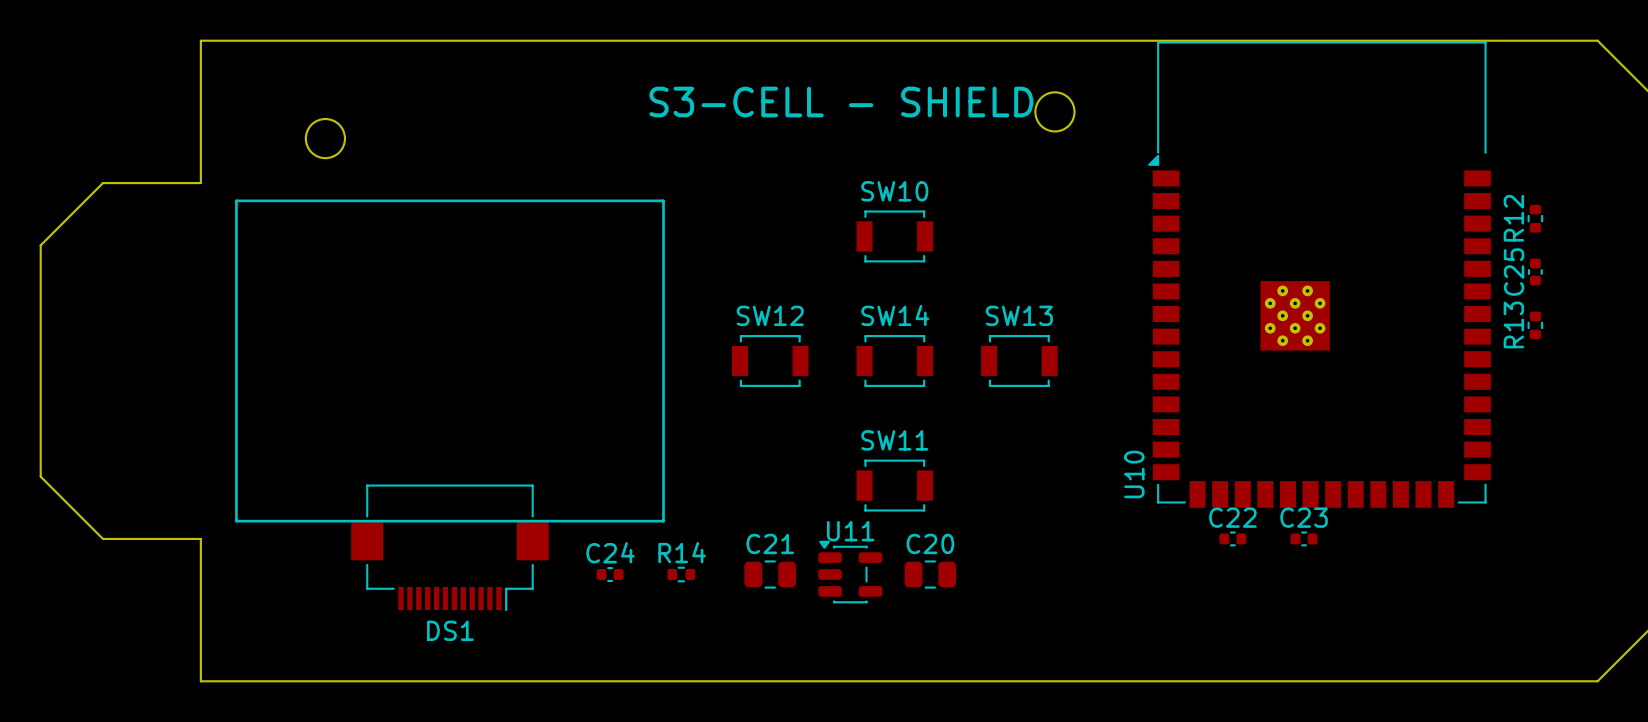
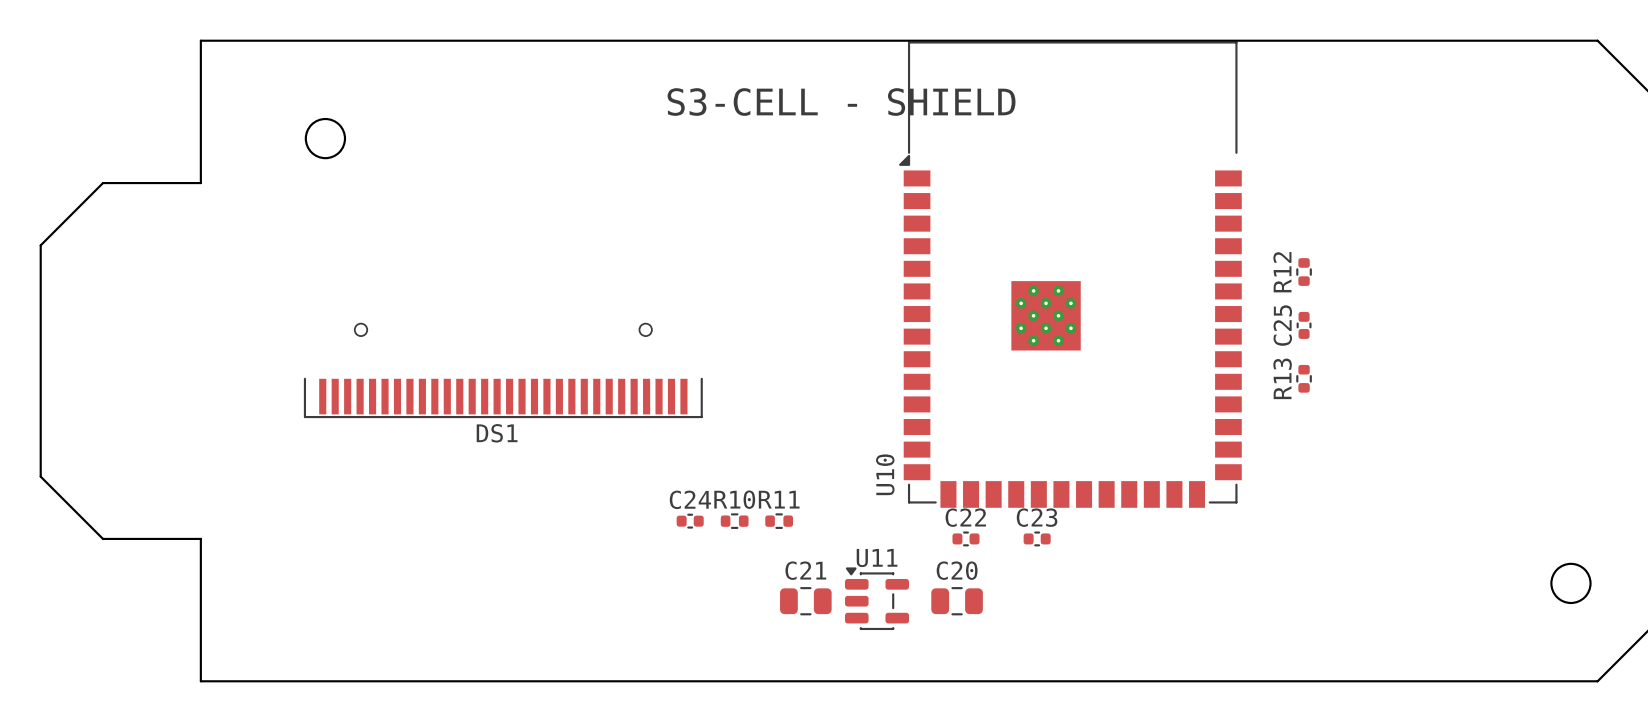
round board edge: [1034, 91, 1076, 133] -> none
line: (236, 200) (663, 200) (663, 521) (236, 521) (236, 200) -> none
R12 position: (1535, 218) -> (1304, 272)
SW10: (894, 236) -> none
C25 position: (1535, 272) -> (1304, 325)
U10 position: (1319, 274) -> (1070, 274)
R13 position: (1535, 325) -> (1304, 378)
SW12: (770, 361) -> none
SW14: (894, 361) -> none
SW13: (1019, 361) -> none
DS1 footprint: [351, 484, 549, 612] -> [303, 322, 703, 419]
SW11: (894, 485) -> none
R10: none -> (734, 521)
R11: none -> (779, 521)
C22 position: (1232, 538) -> (965, 538)
C23 position: (1304, 538) -> (1037, 538)
round board edge: none -> [1550, 562, 1592, 605]
U11 position: (850, 572) -> (877, 598)
C24 position: (610, 574) -> (690, 521)
R14: (681, 574) -> none
C21 position: (770, 574) -> (805, 601)
C20 position: (930, 574) -> (957, 601)

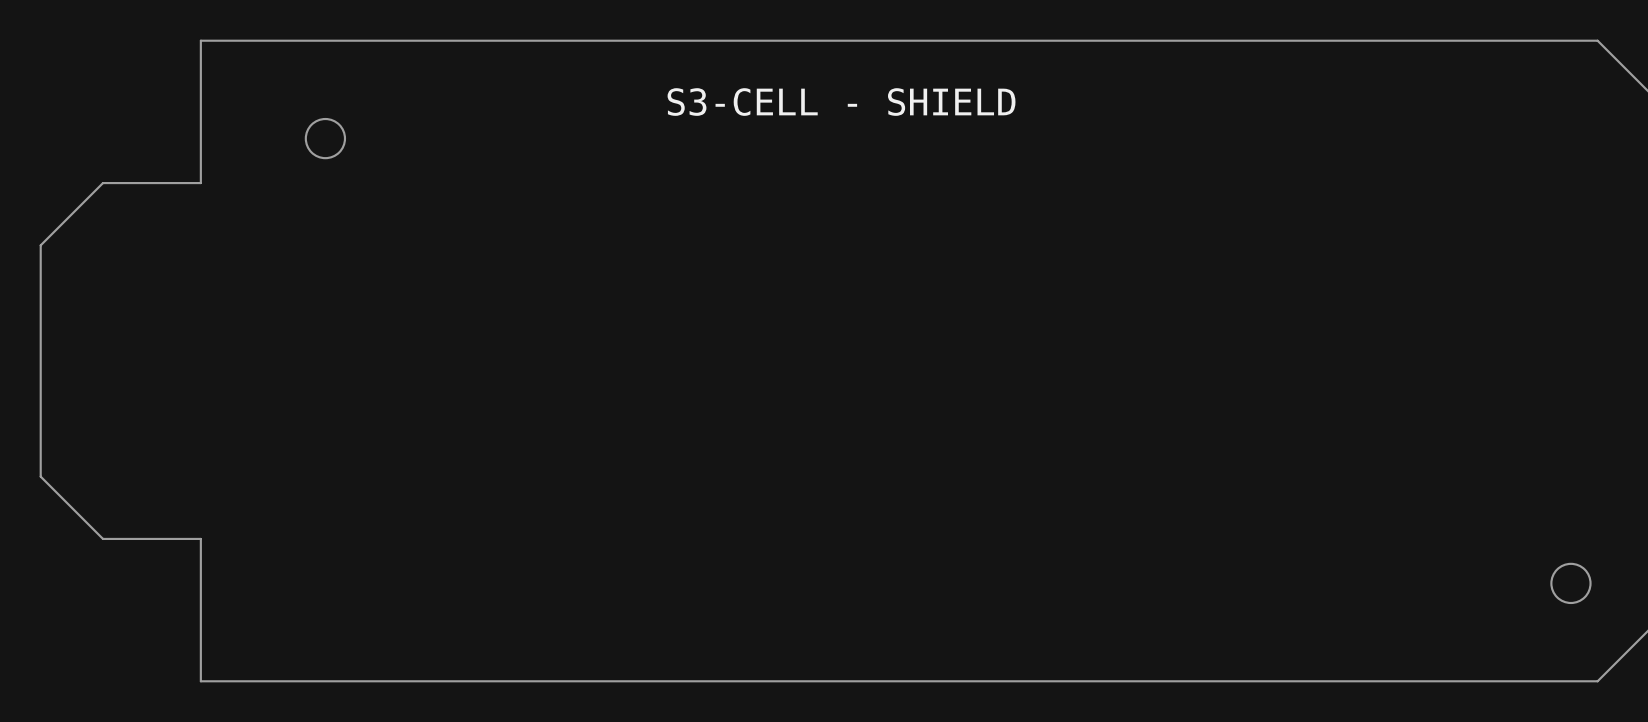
R12: (1304, 272) -> none
U10: (1070, 274) -> none
C25: (1304, 325) -> none
DS1: (503, 370) -> none
R13: (1304, 378) -> none
C24: (690, 521) -> none
R10: (734, 521) -> none
R11: (779, 521) -> none
C22: (965, 538) -> none
C23: (1037, 538) -> none
U11: (877, 598) -> none
C21: (805, 601) -> none
C20: (957, 601) -> none

